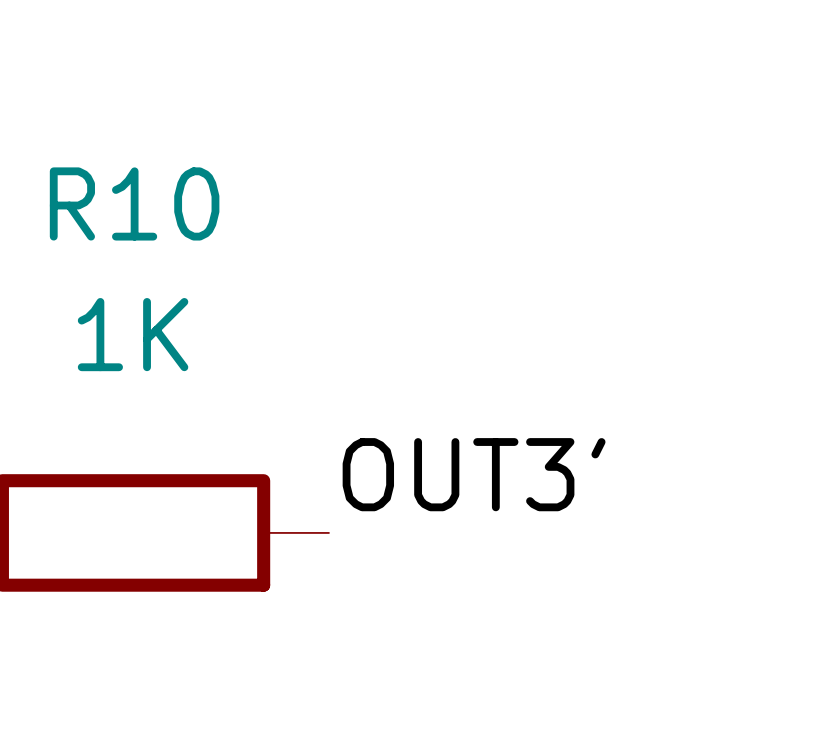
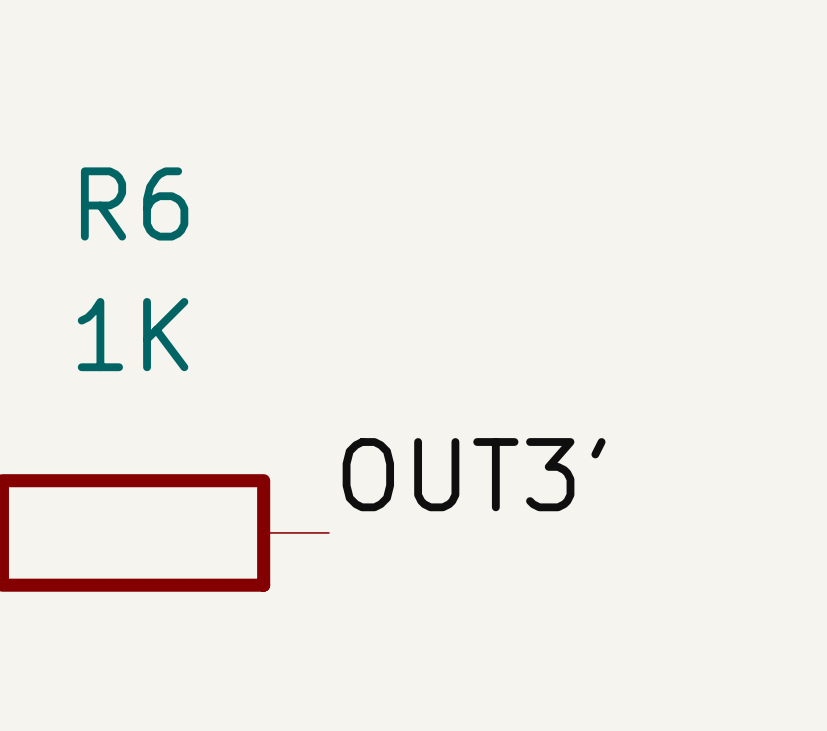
R10 name: R10 (134, 203) -> R6 (134, 203)

